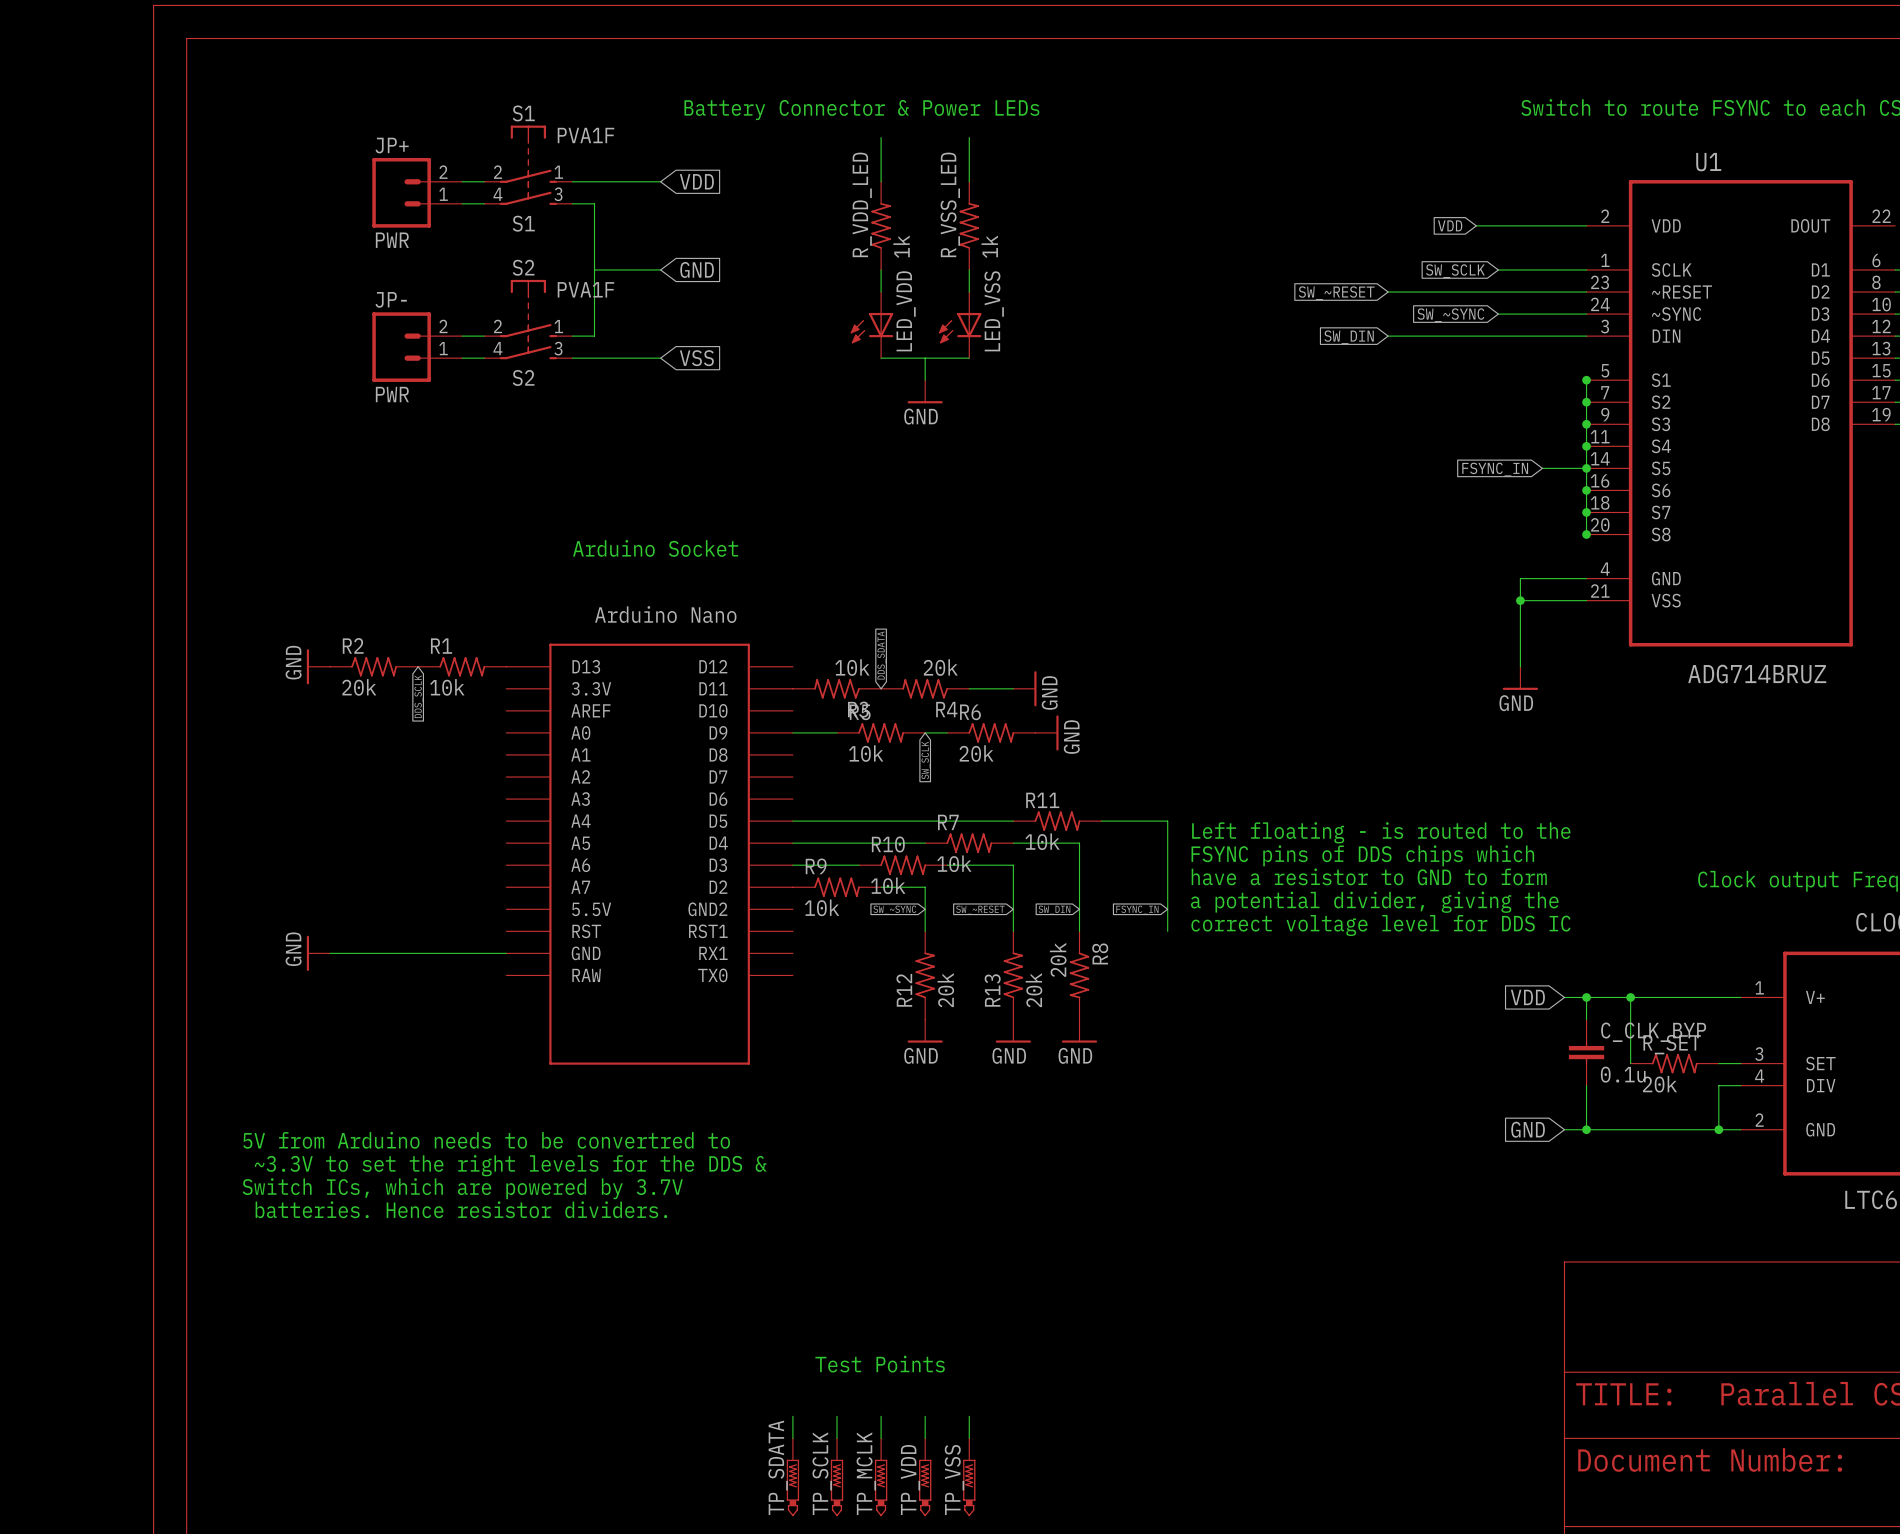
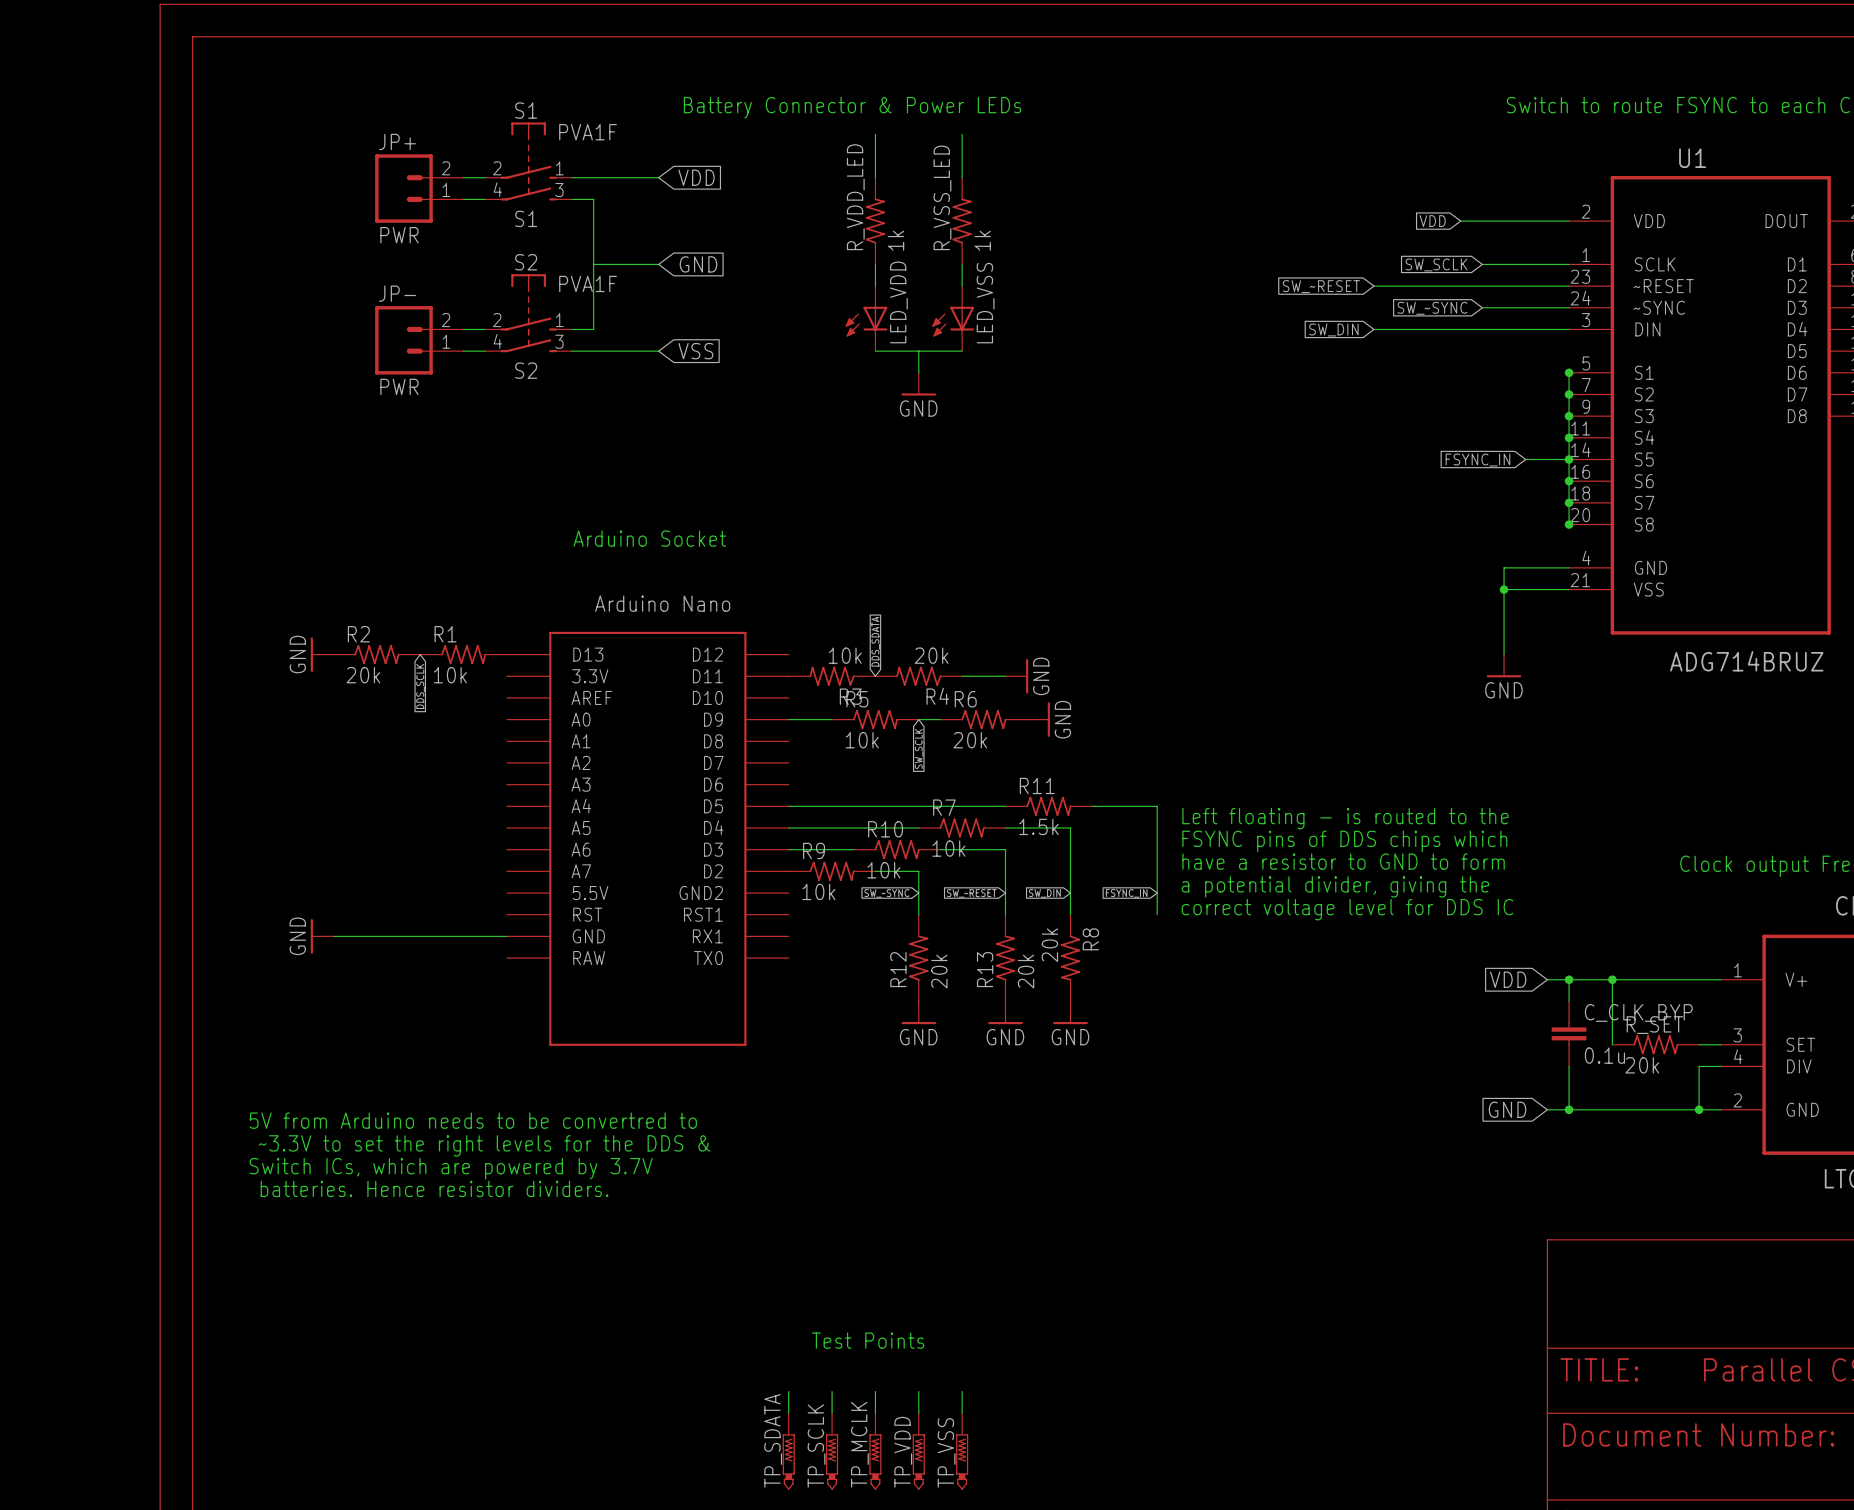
R11 value: 10k (1042, 841) -> 1.5k (1038, 826)

